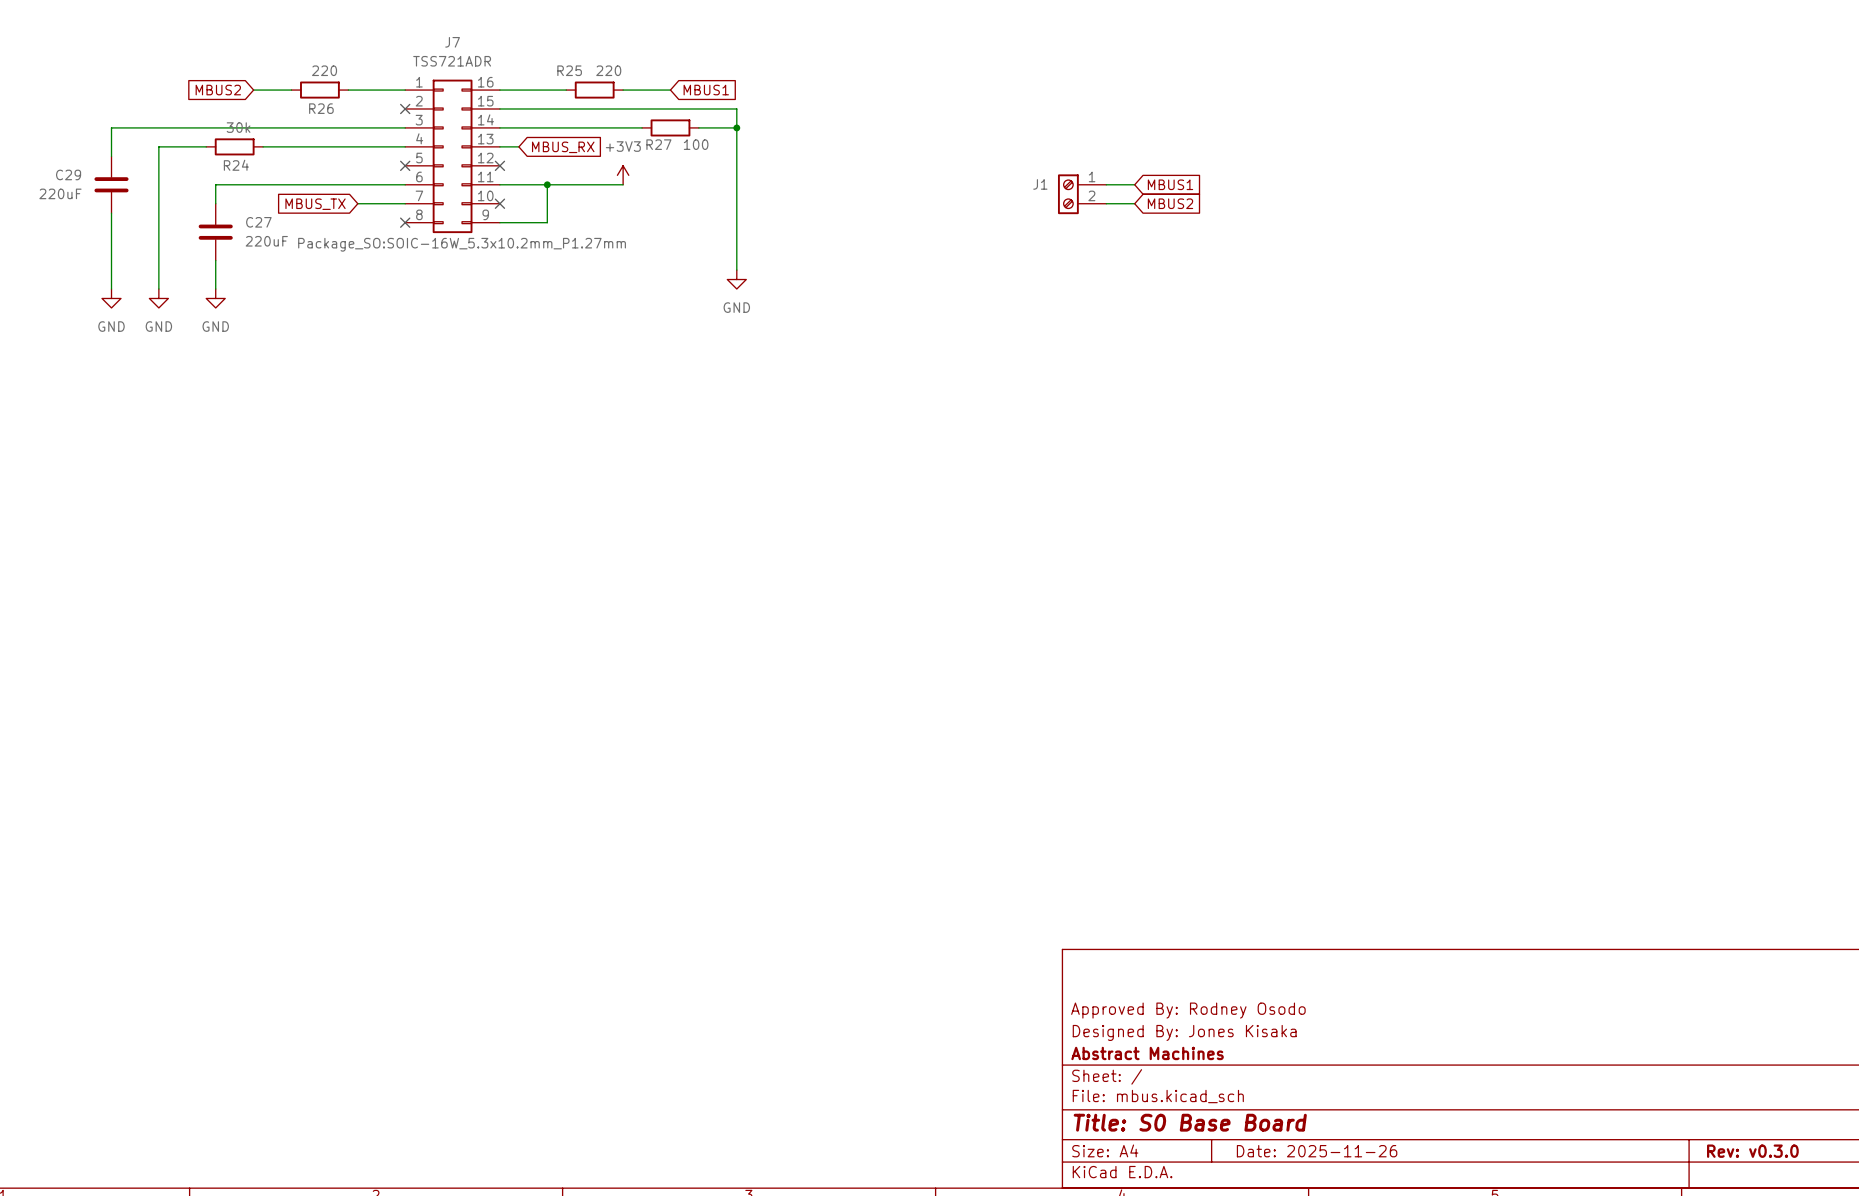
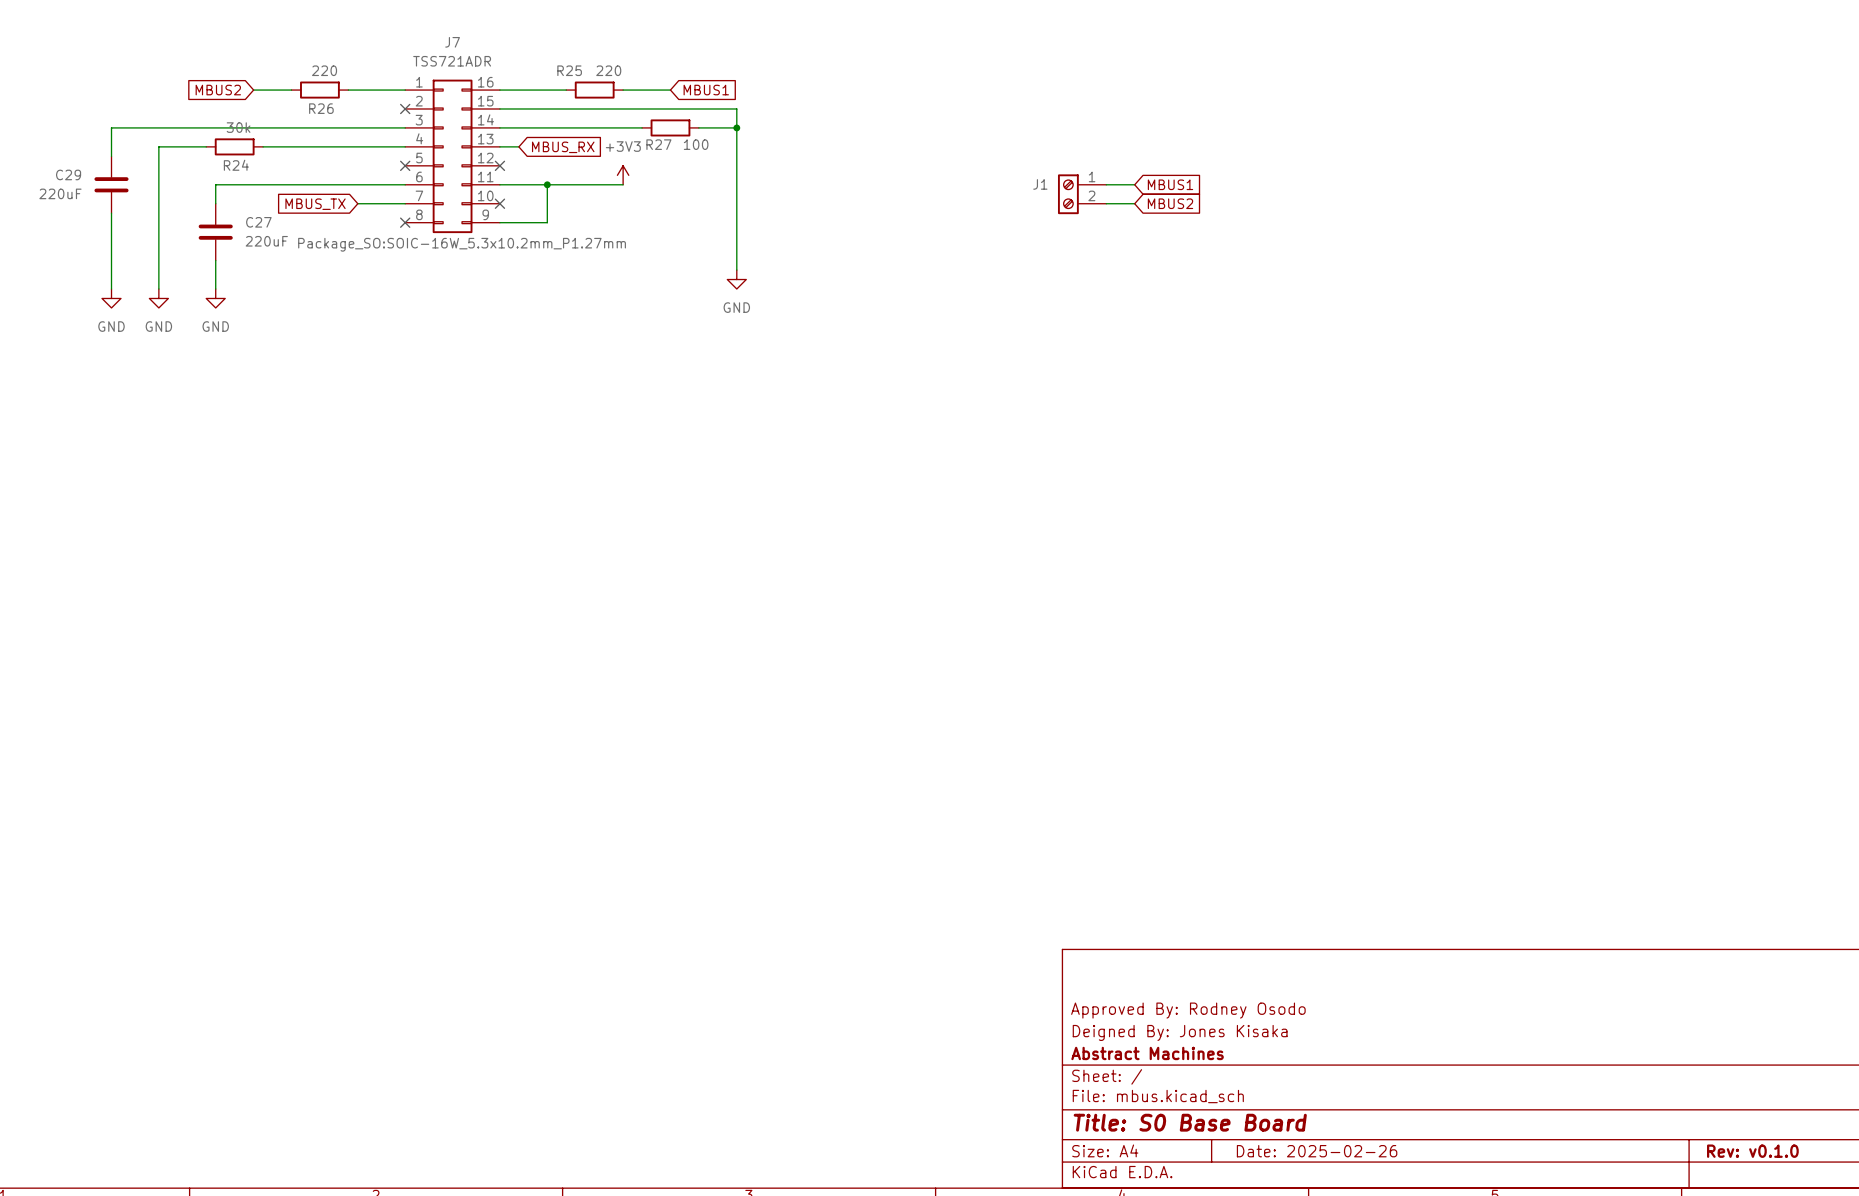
title block: Designed By: Jones Kisaka (1184, 1032) -> Deigned By: Jones Kisaka (1180, 1032)
title block: Date: 2025-11-26 (1317, 1151) -> Date: 2025-02-26 (1317, 1151)
title block: Rev: v0.3.0 (1752, 1151) -> Rev: v0.1.0 (1752, 1151)

